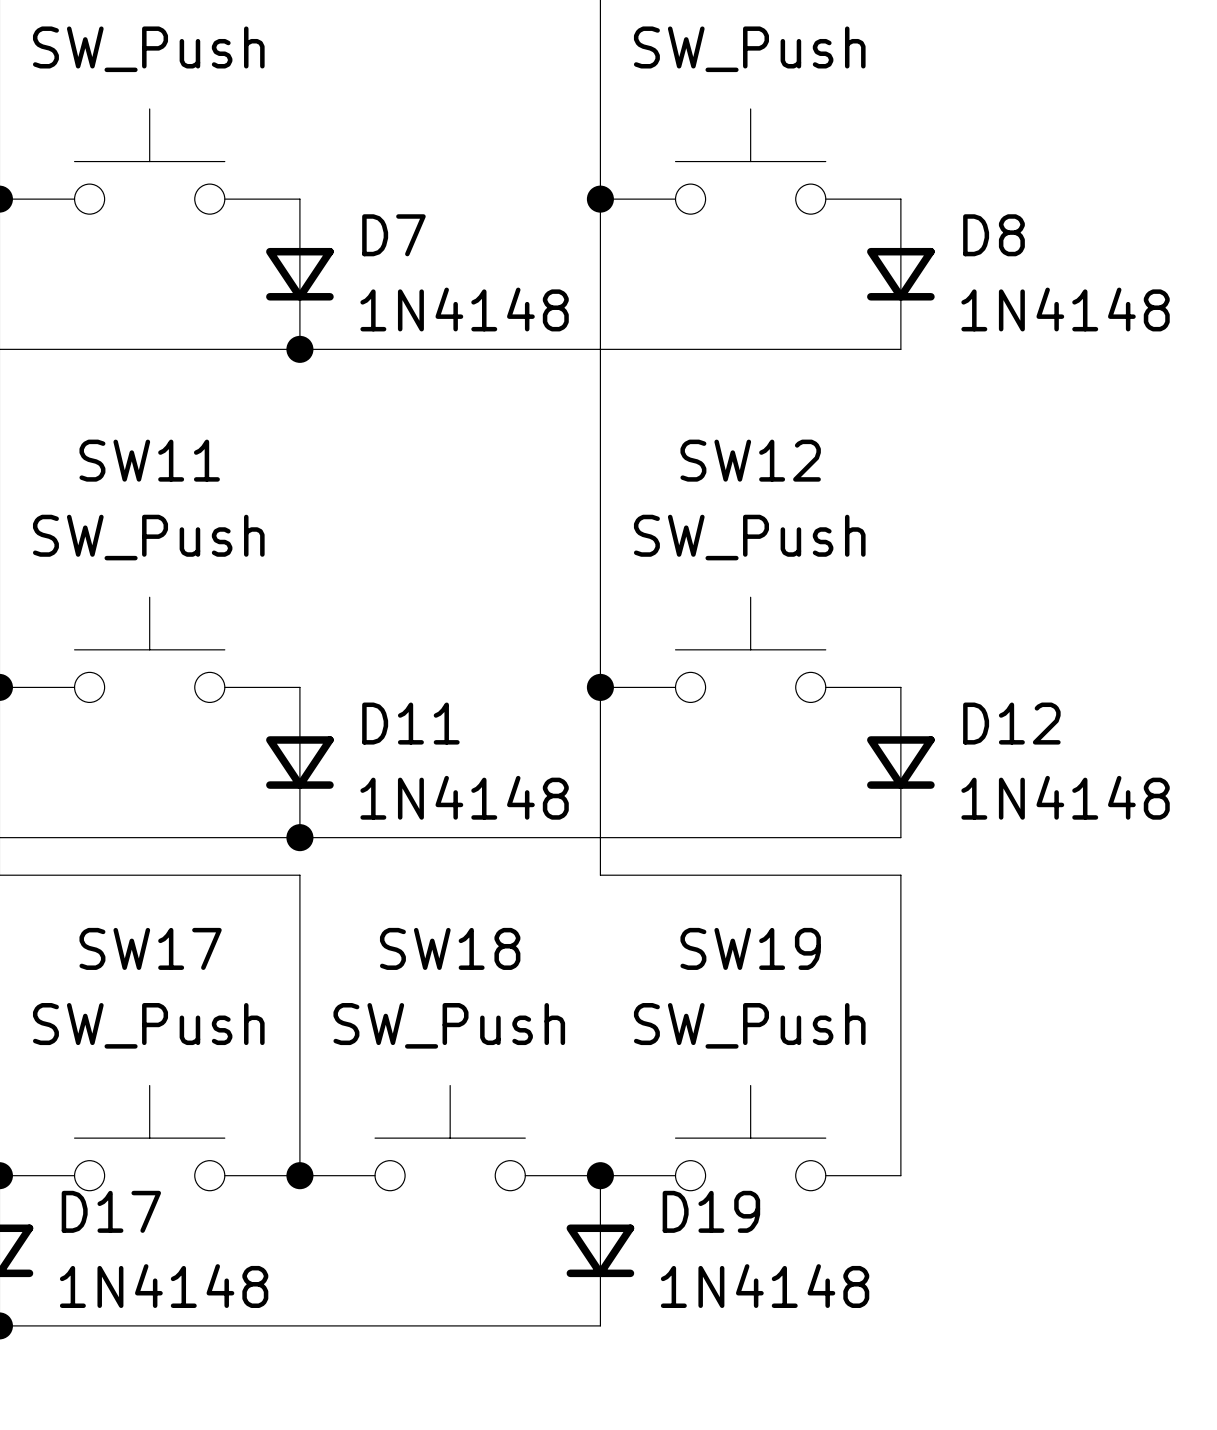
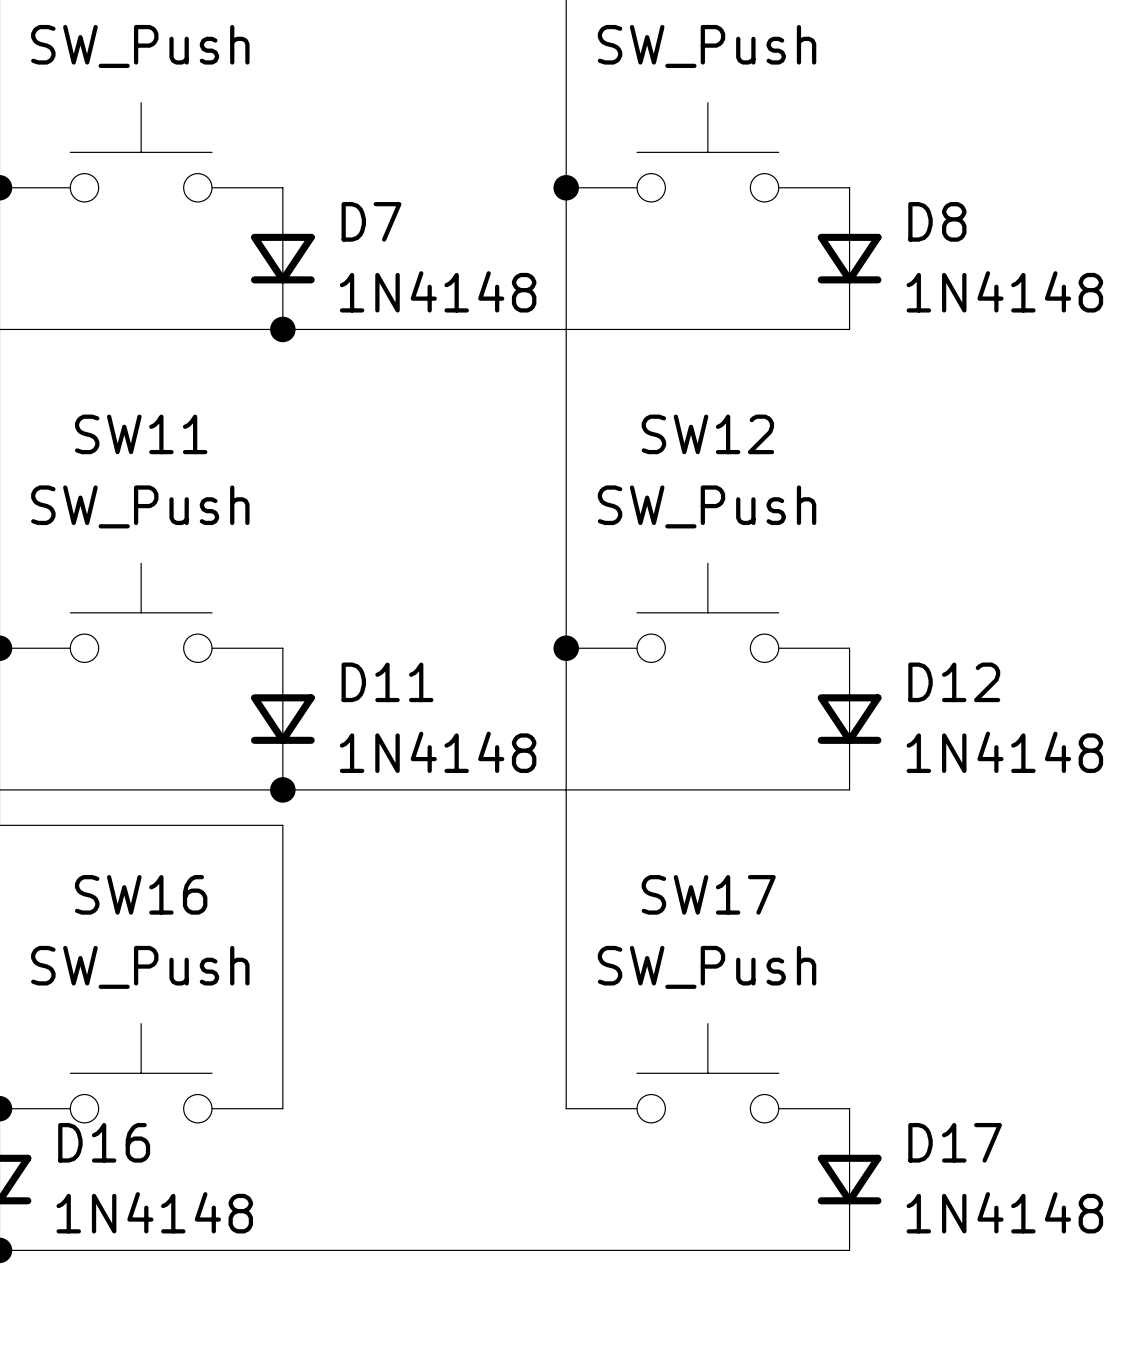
wire: (600, 875) (900, 875) (900, 1175) -> (566, 825) (566, 1108)
SW17 name: SW17 (150, 948) -> SW16 (141, 894)
SW19 name: SW19 (750, 948) -> SW17 (708, 894)
SW18: SW_Push (450, 1138) -> none
junction: (299, 1175) -> none
junction: (600, 1175) -> none
D17 name: D17 (111, 1211) -> D16 (104, 1142)
D19: 1N4148 (600, 1250) -> none
D17: none -> 1N4148 (849, 1179)
wire: none -> (566, 1250) (849, 1250)

